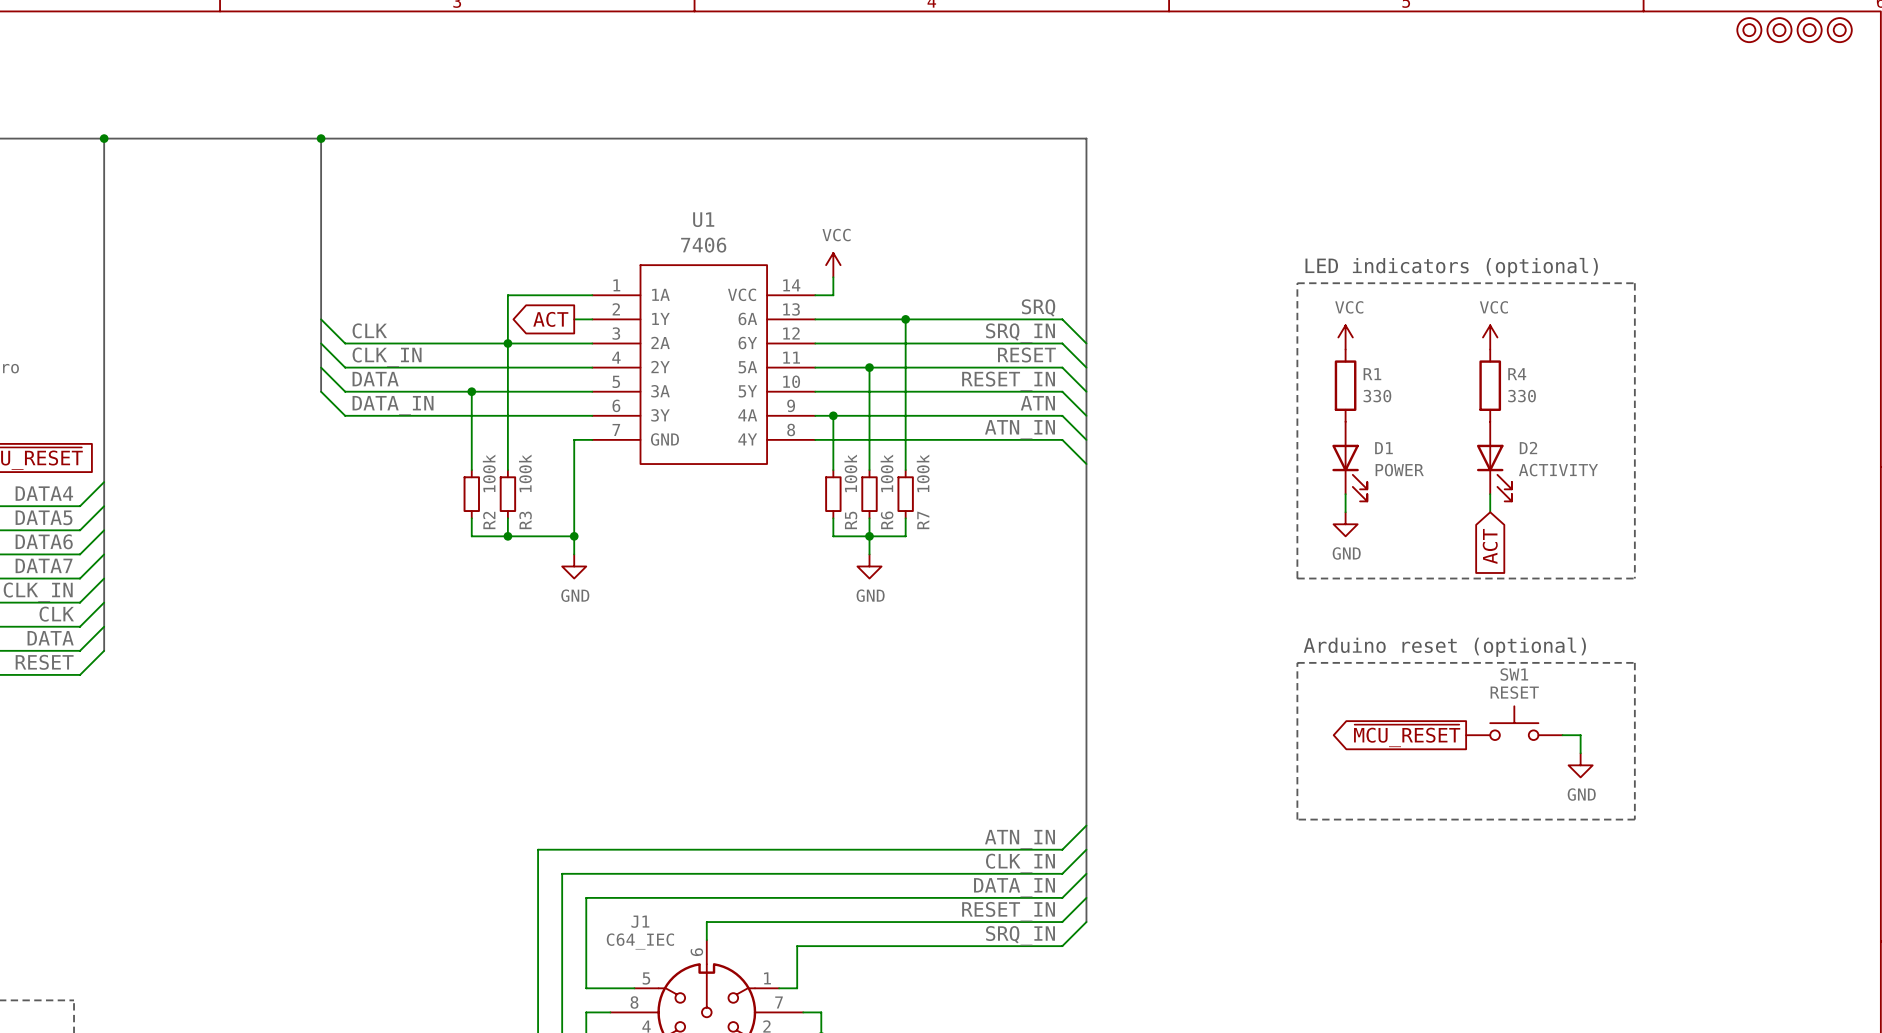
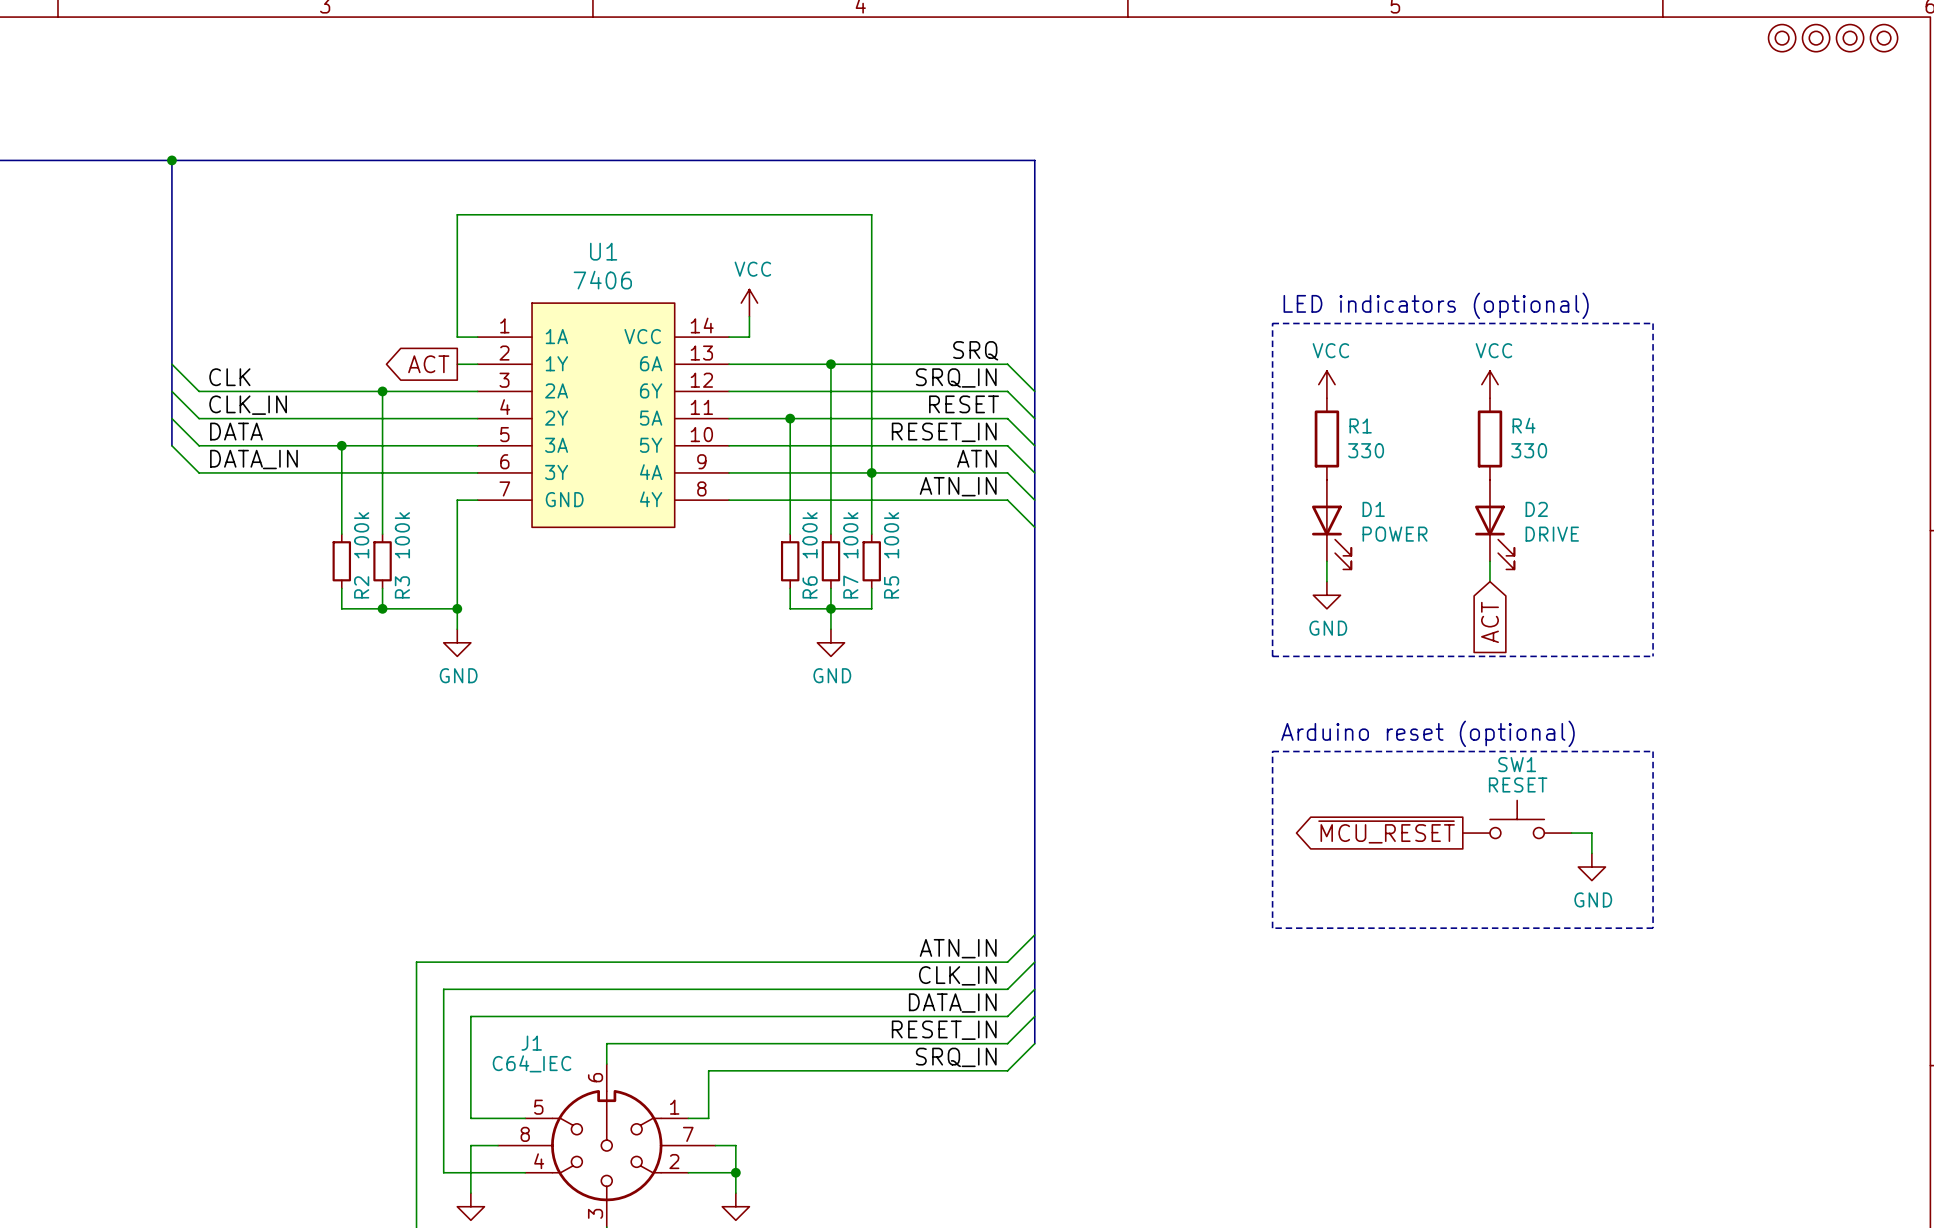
wire: (574, 295) (507, 295) (507, 343) -> (457, 337) (457, 214) (871, 214) (871, 534)
wire: (833, 415) (833, 470) -> none
junction: (833, 415) -> none
junction: none -> (871, 472)
D2 value: ACTIVITY (1558, 470) -> DRIVE (1552, 534)
R5 position: (833, 494) -> (871, 561)
wire: (833, 518) (833, 536) (869, 536) (869, 554) -> none
wire: none -> (871, 588) (871, 608) (830, 608) (830, 629)
junction position: (869, 536) -> (830, 608)
power symbol position: GND (869, 566) -> GND (830, 642)

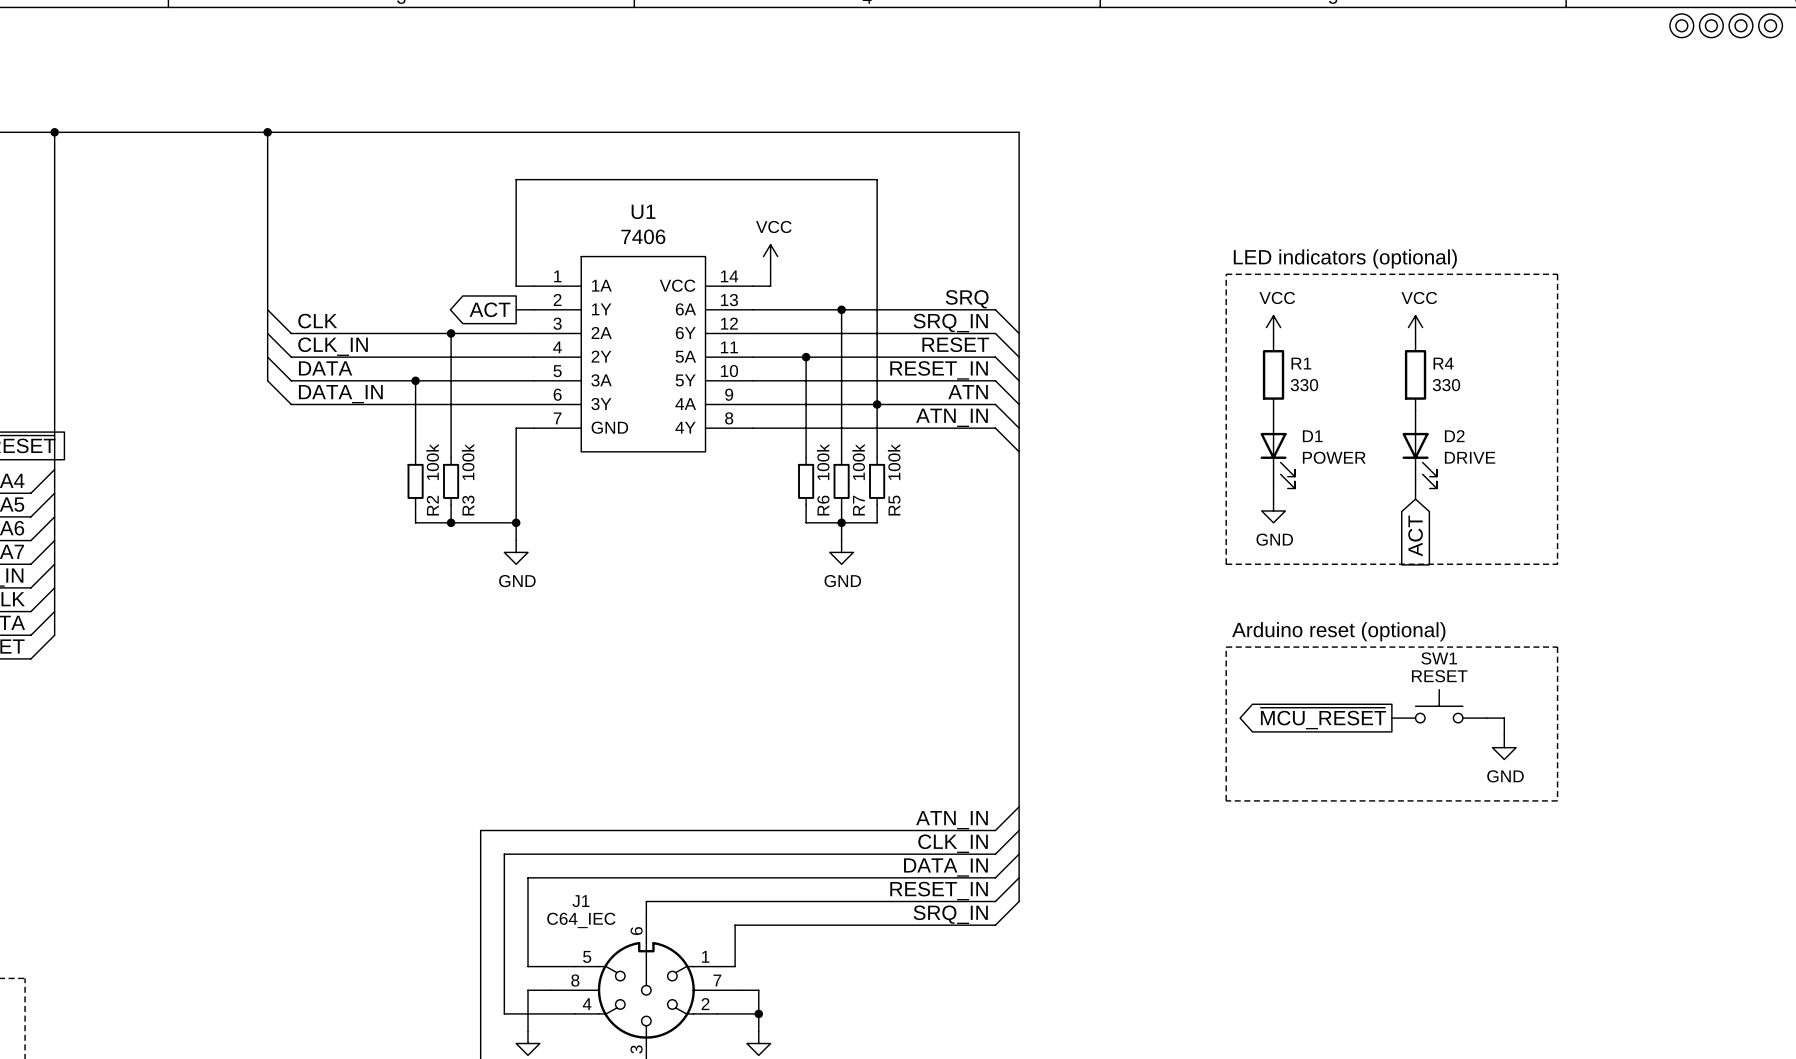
part: (1782, 38) -> none
part: none -> (1681, 25)
part: (1816, 38) -> none
part: none -> (1711, 25)
part: (1850, 38) -> none
part: none -> (1740, 25)
part: (1884, 38) -> none
part: none -> (1770, 25)

